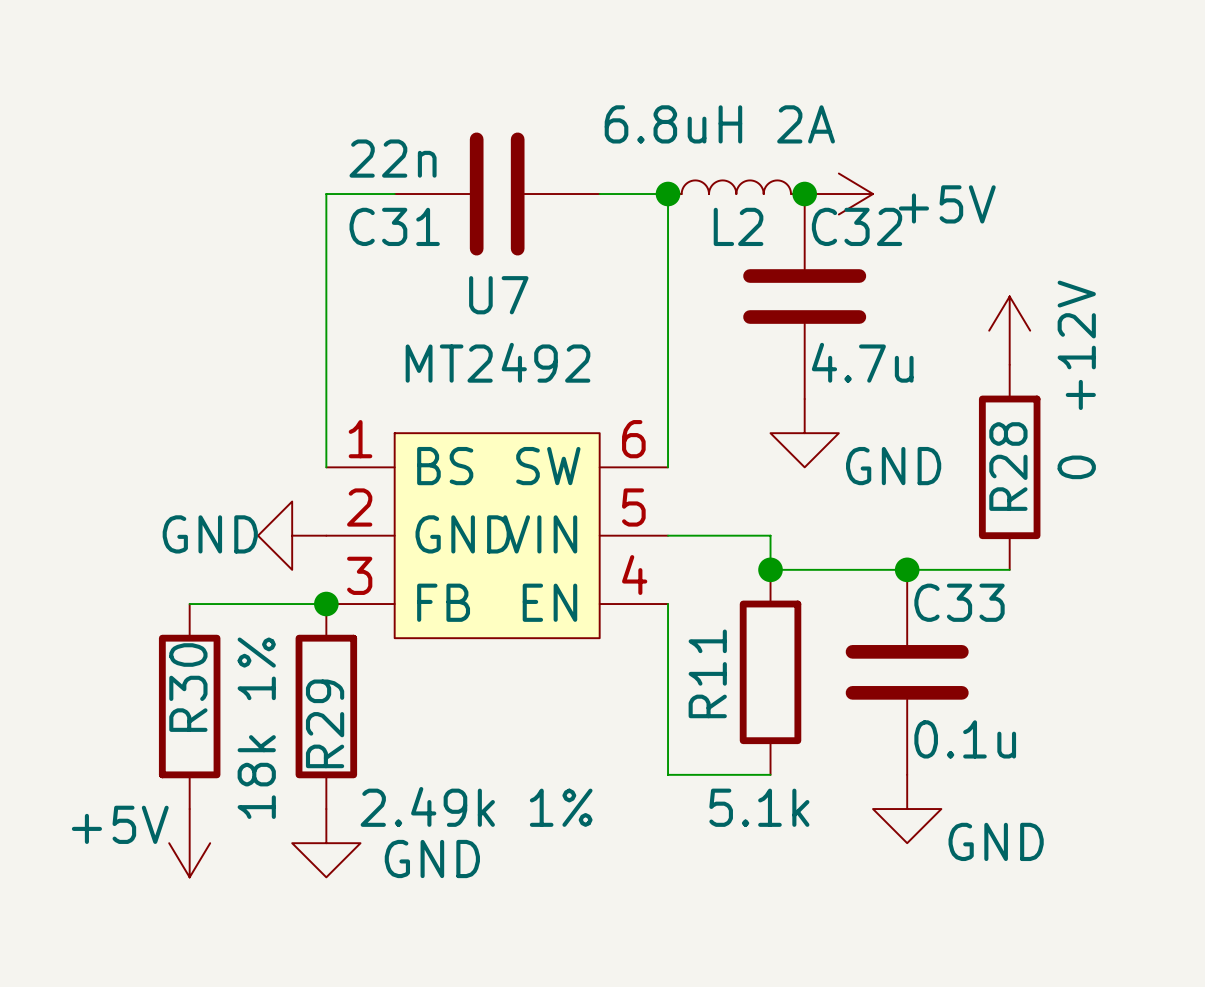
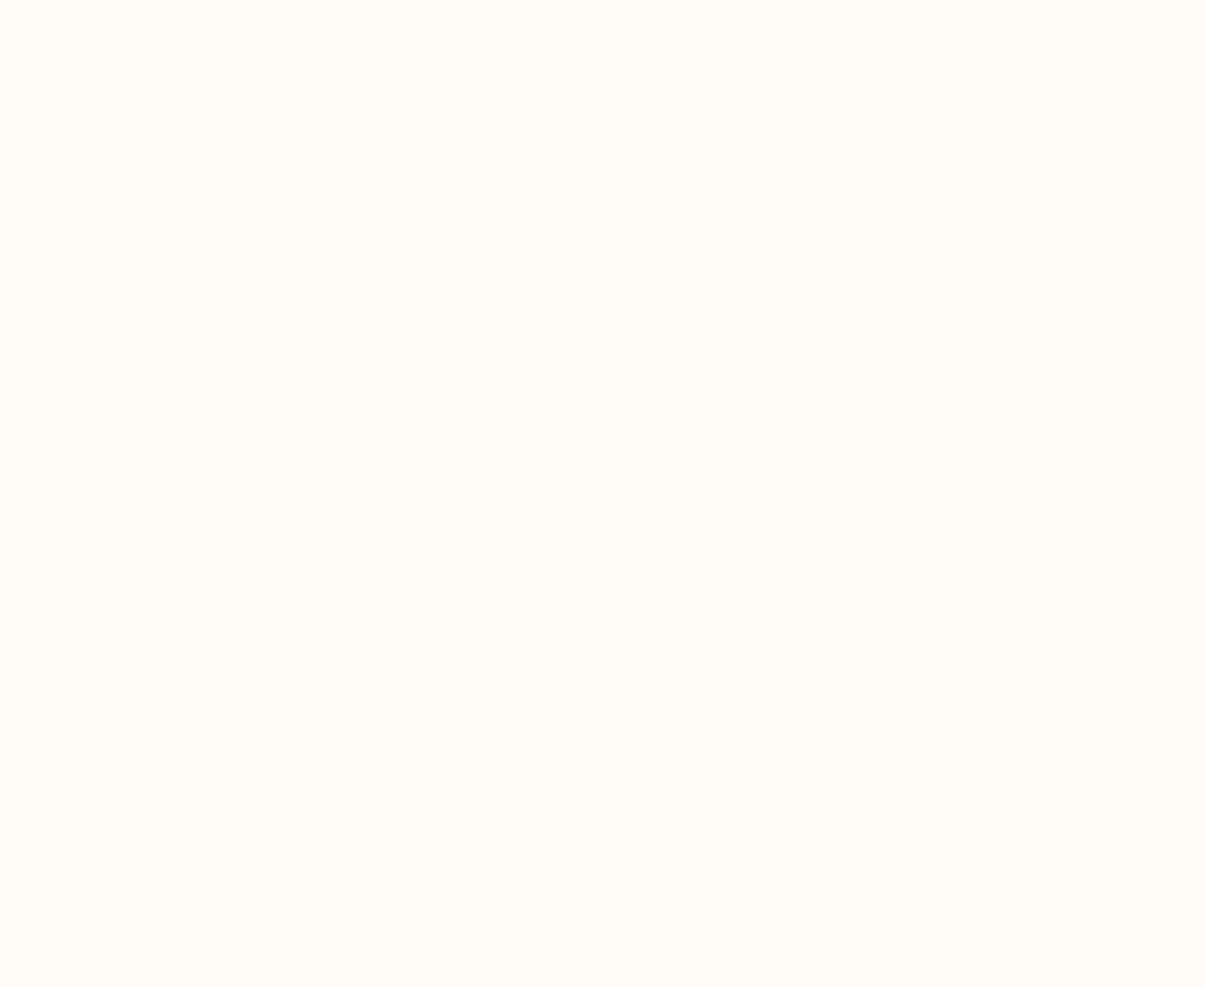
L2: 6.8uH 2A (736, 187) -> none
wire: (394, 194) (326, 194) (326, 467) -> none
C31: 22n (497, 194) -> none
wire: (599, 194) (668, 194) (668, 467) -> none
junction: (668, 194) -> none
junction: (804, 194) -> none
power symbol: +5V (838, 194) -> none
C32: 4.7u (804, 296) -> none
power symbol: +12V (1009, 330) -> none
power symbol: GND (804, 433) -> none
R28: 0 (1009, 467) -> none
power symbol: GND (292, 535) -> none
U7: MT2492 (497, 535) -> none
wire: (668, 535) (770, 535) (770, 569) (1009, 569) -> none
junction: (770, 569) -> none
junction: (907, 569) -> none
wire: (189, 604) (326, 604) -> none
junction: (326, 604) -> none
wire: (668, 604) (668, 774) (770, 774) -> none
R11: 5.1k (770, 672) -> none
C33: 0.1u (907, 672) -> none
R30: 18k 1% (189, 706) -> none
R29: 2.49k 1% (326, 706) -> none
power symbol: GND (907, 809) -> none
power symbol: +5V (189, 843) -> none
power symbol: GND (326, 843) -> none

